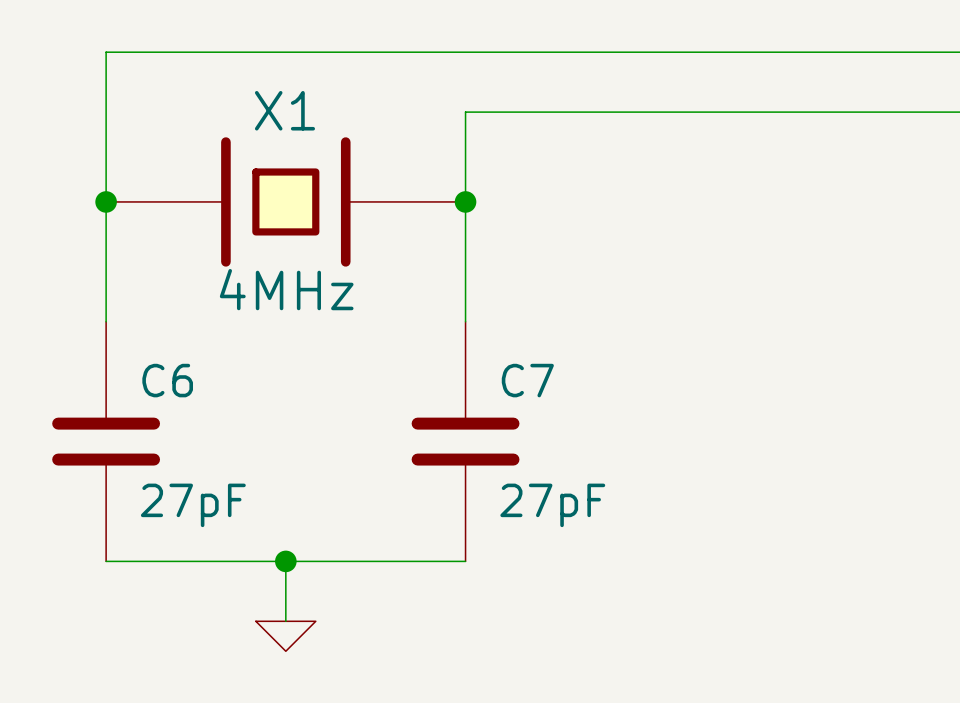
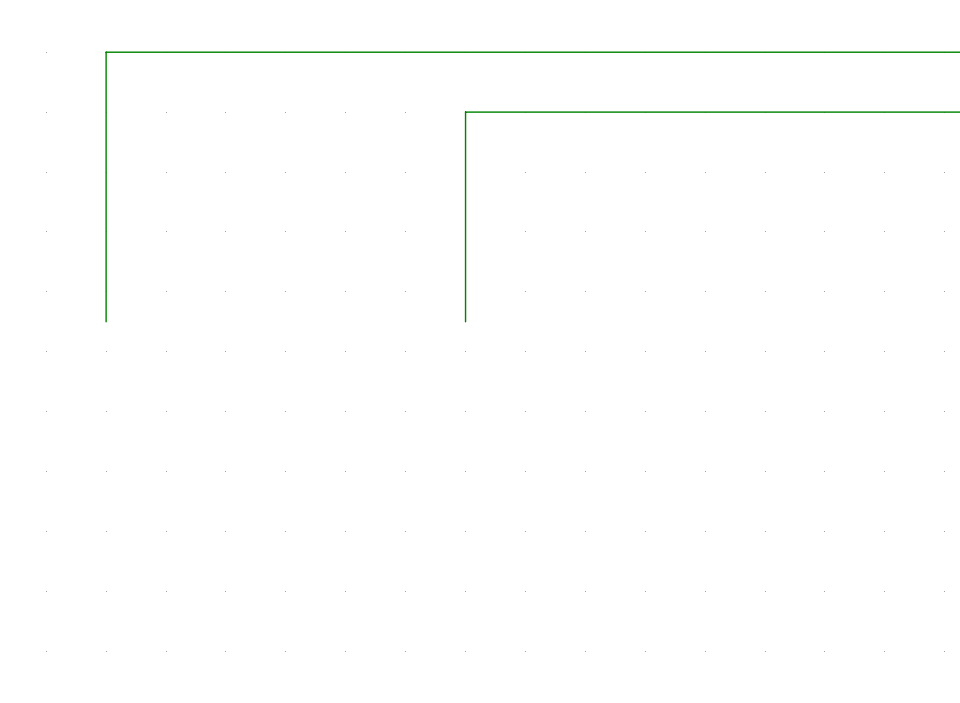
junction: (106, 201) -> none
X1: 4MHz (285, 201) -> none
junction: (465, 201) -> none
C6: 27pF (106, 441) -> none
C7: 27pF (465, 441) -> none
wire: (106, 561) (465, 561) -> none
wire: (285, 561) (285, 621) -> none
junction: (285, 561) -> none
power symbol: (285, 636) -> none

